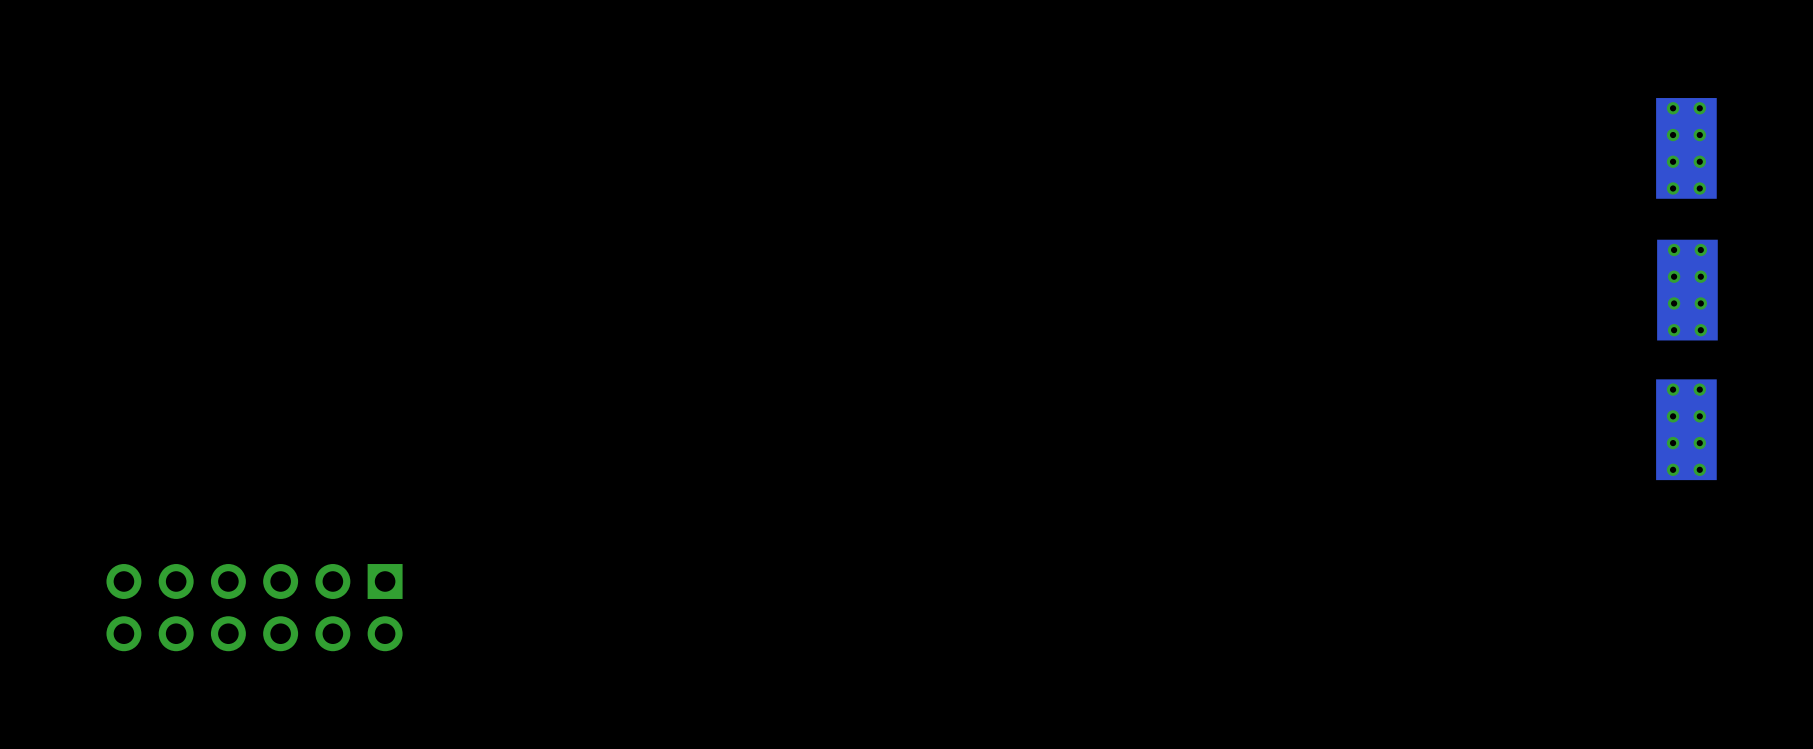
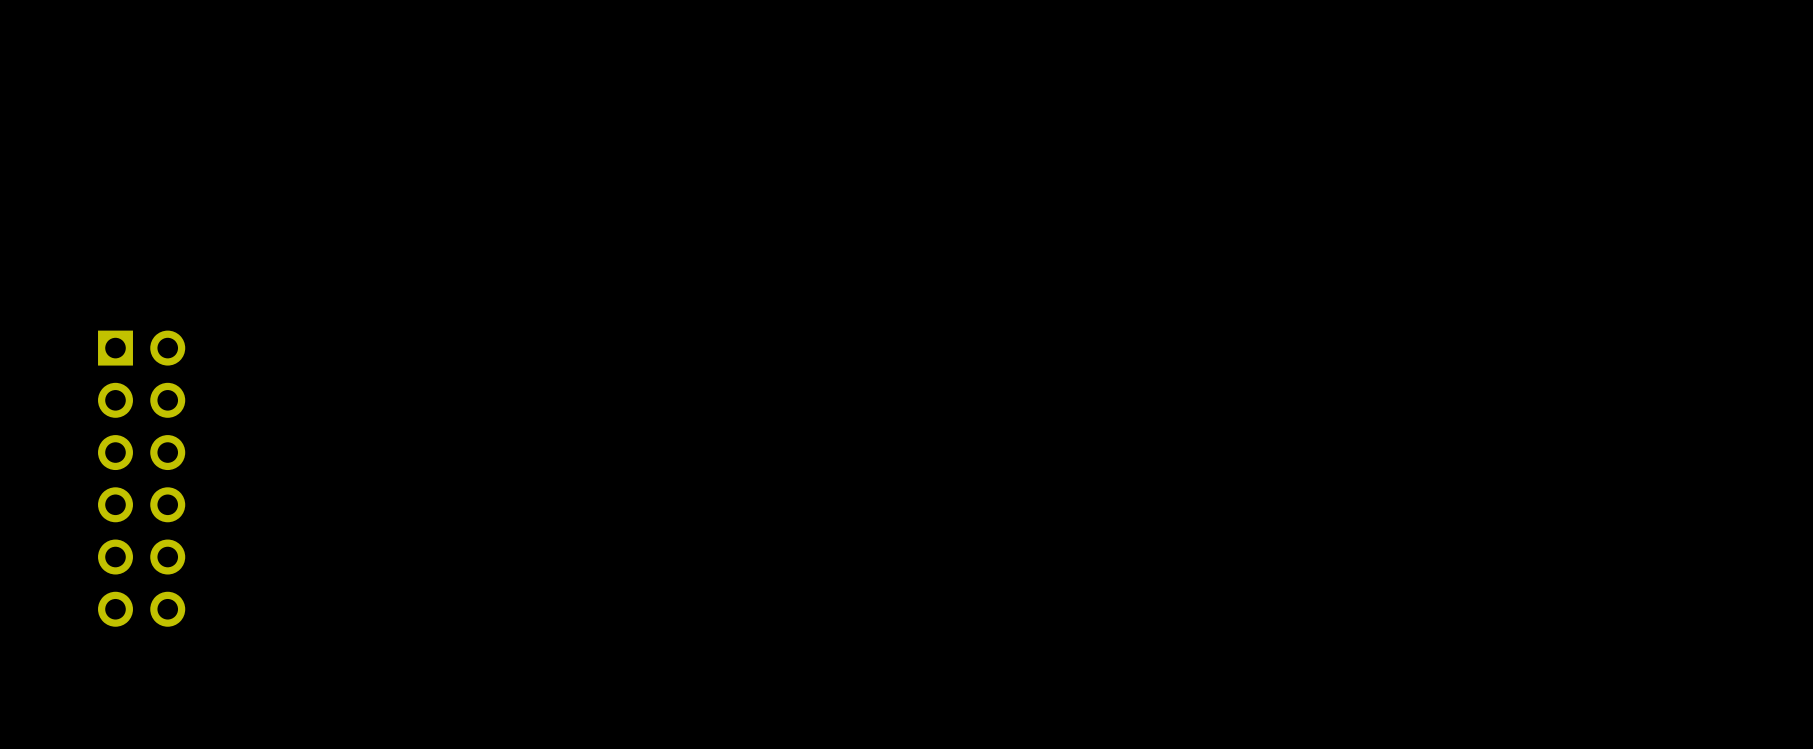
part: (1686, 148) -> none
part: (1687, 290) -> none
part: (1686, 429) -> none
part rotation: 0° (254, 607) -> 90° counterclockwise (141, 478)

